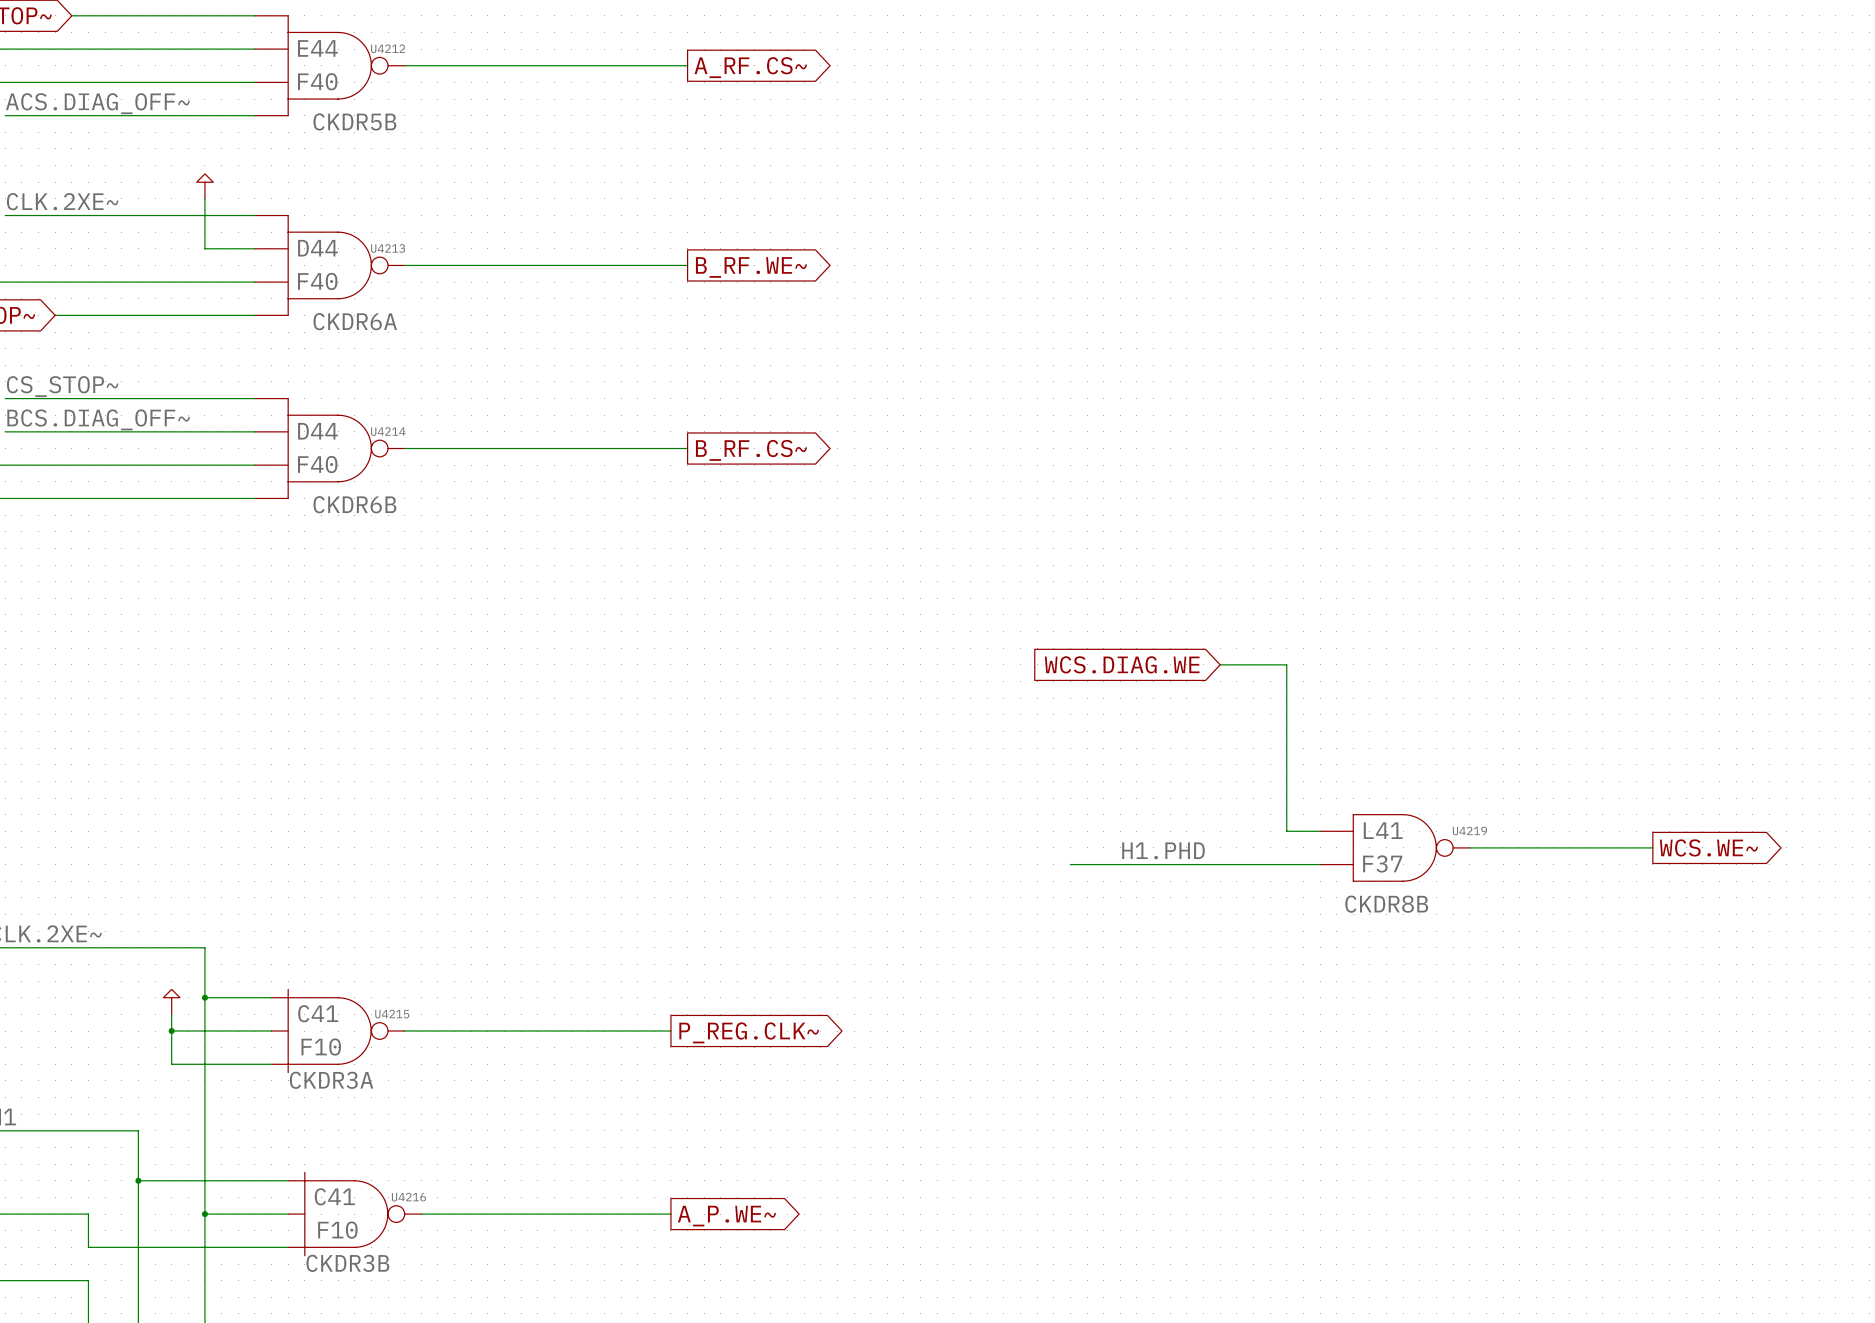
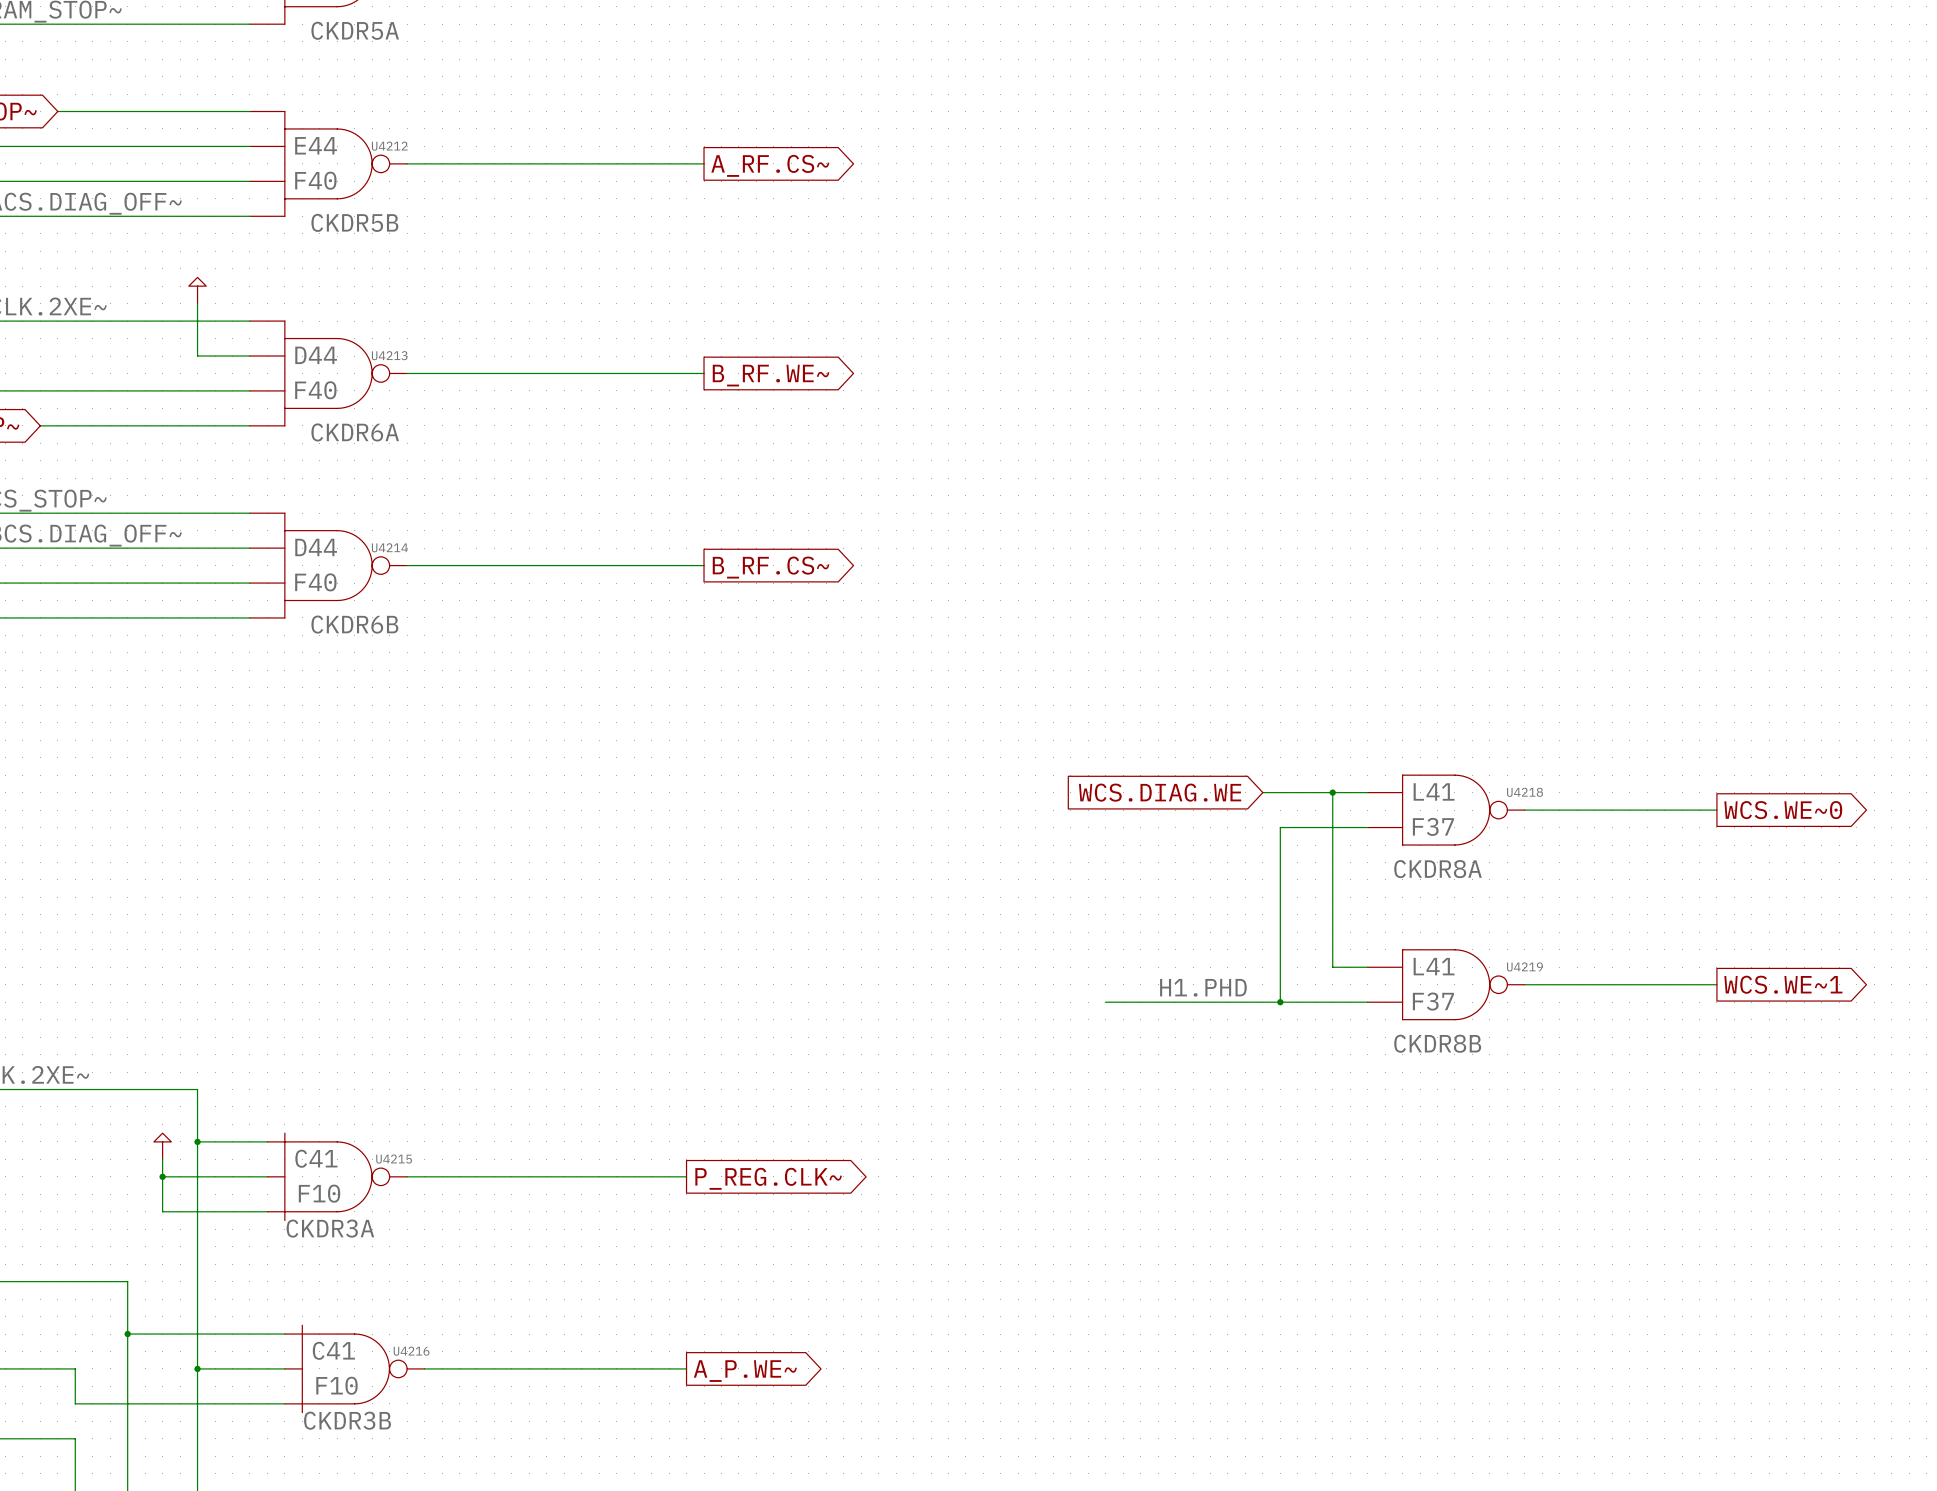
wire: none -> (1332, 792) (1367, 792)
junction: none -> (1332, 792)
U4218: none -> F37 (1446, 810)
wire: none -> (1524, 810) (1716, 810)
global label: none -> WCS.WE~0 (1783, 810)
wire: none -> (1367, 827) (1280, 827) (1280, 1002)
global label: WCS.WE~ (1708, 847) -> WCS.WE~1 (1783, 984)
junction: none -> (1280, 1002)

